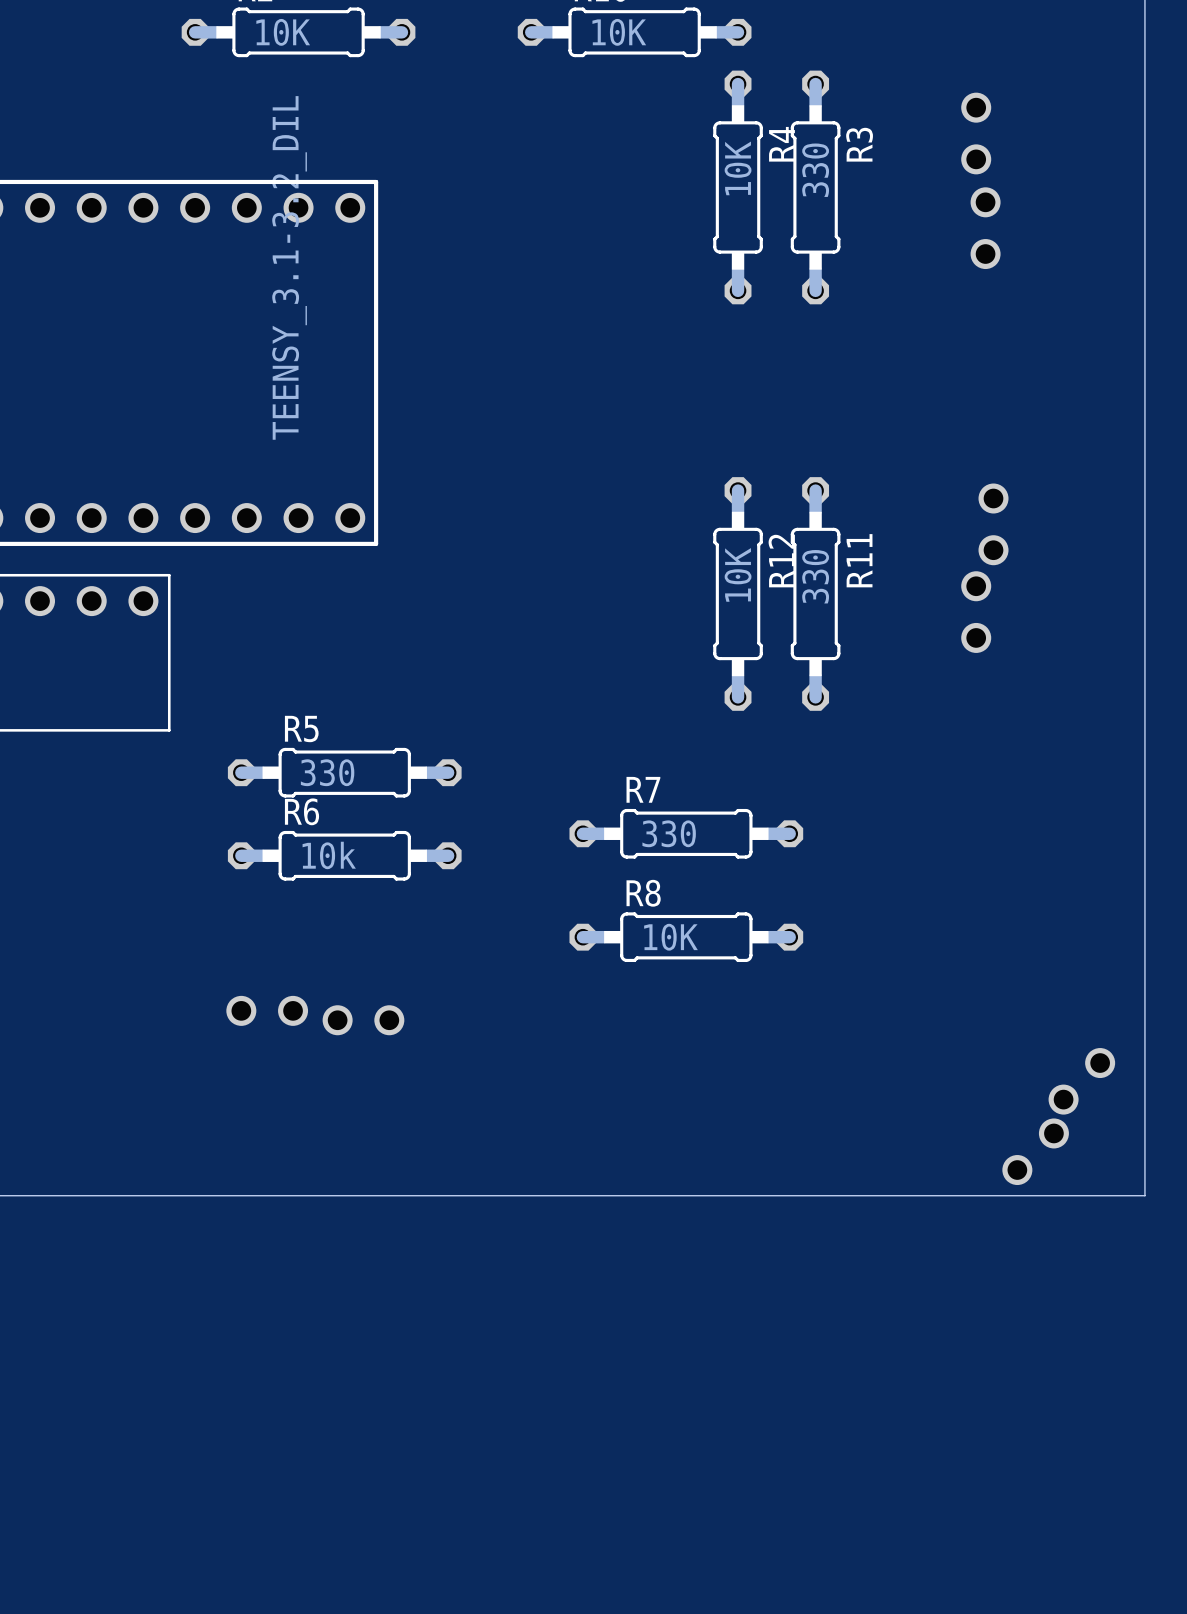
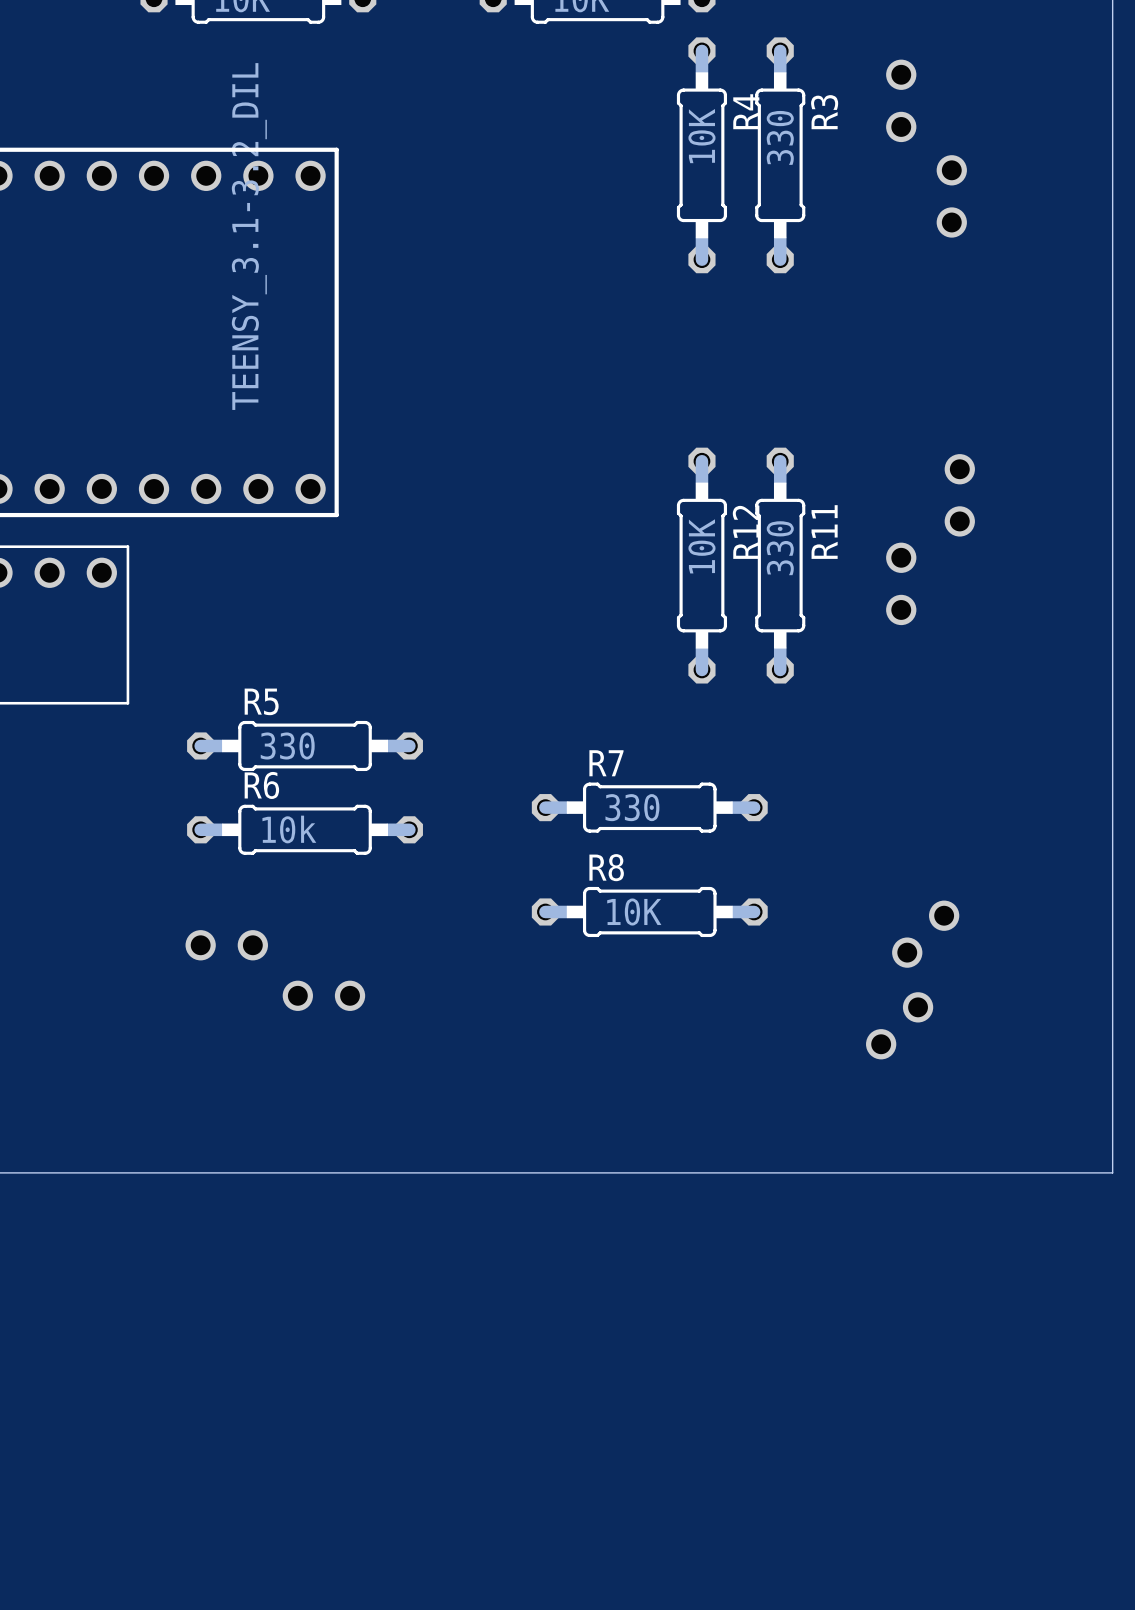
part position: (976, 133) -> (901, 100)
part position: (976, 612) -> (901, 583)
part: none -> (925, 934)
part position: (267, 1010) -> (226, 945)
part: none -> (899, 1025)
part: (1081, 1081) -> none
part: (1035, 1151) -> none

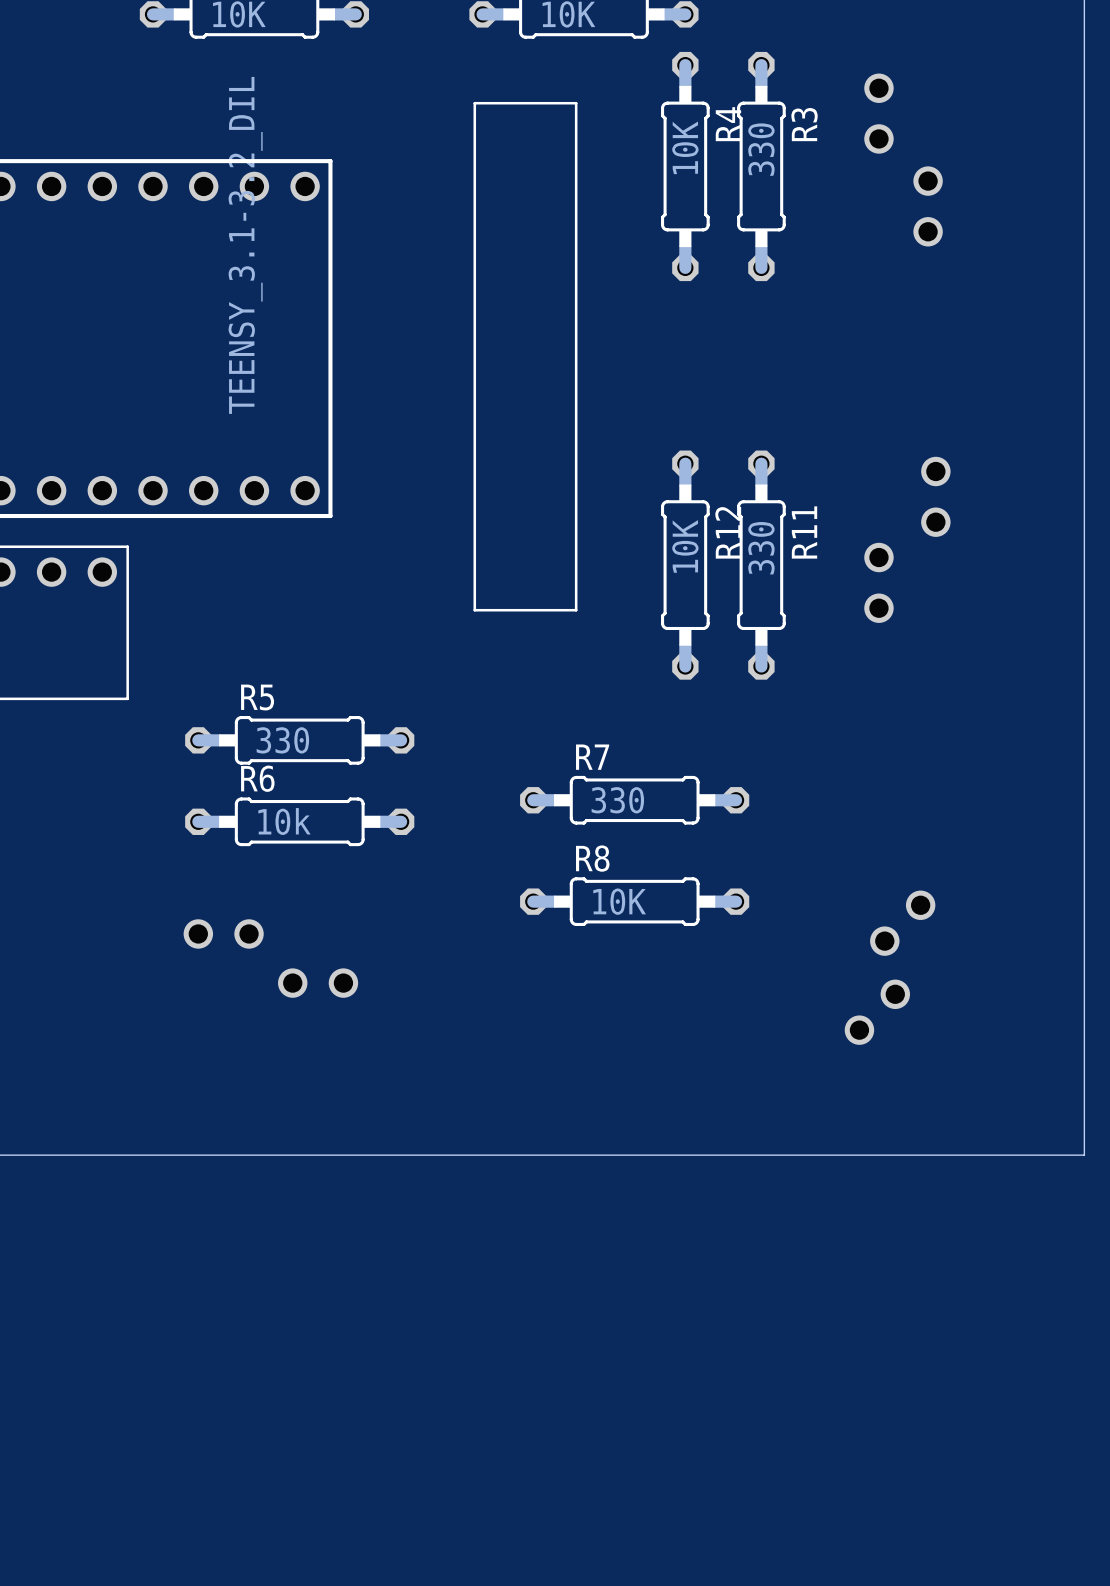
drawing: none -> [473, 101, 578, 612]

